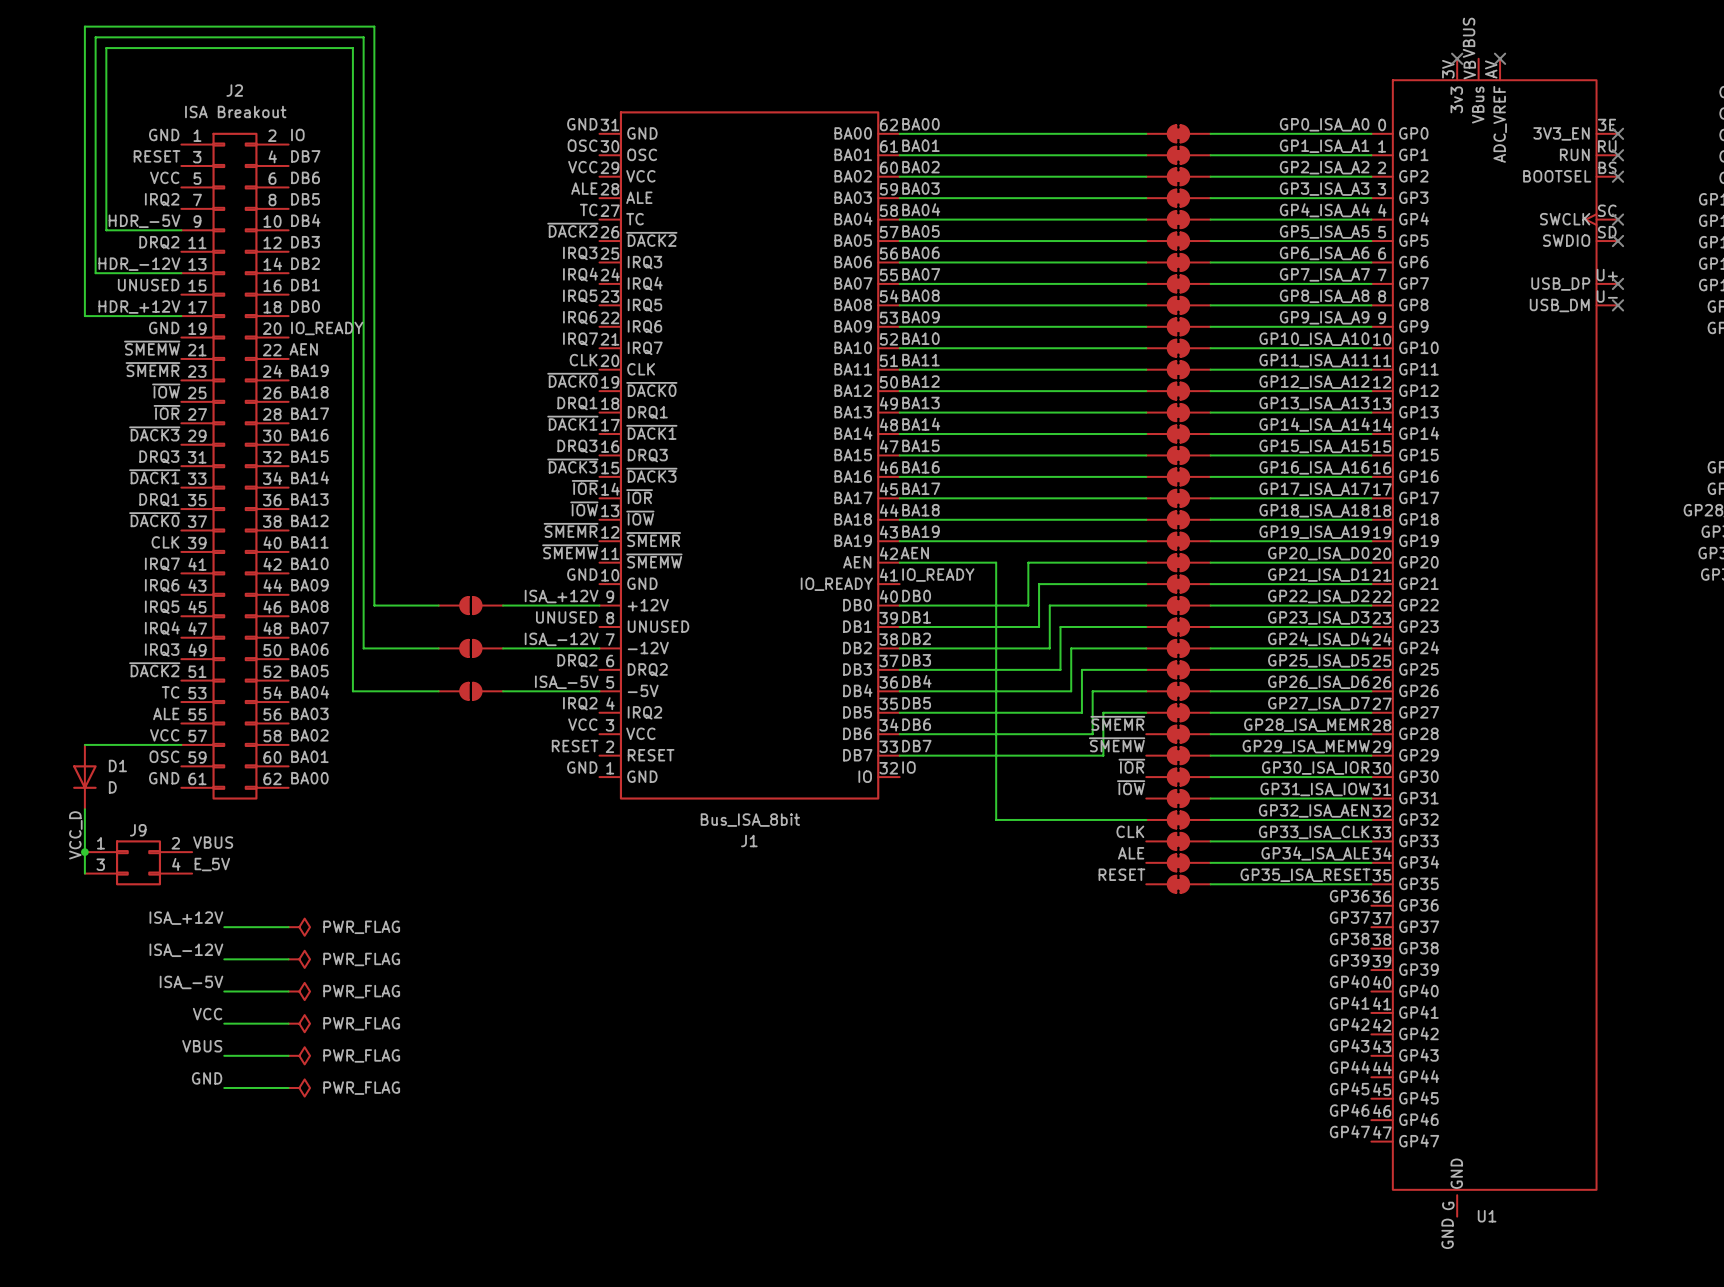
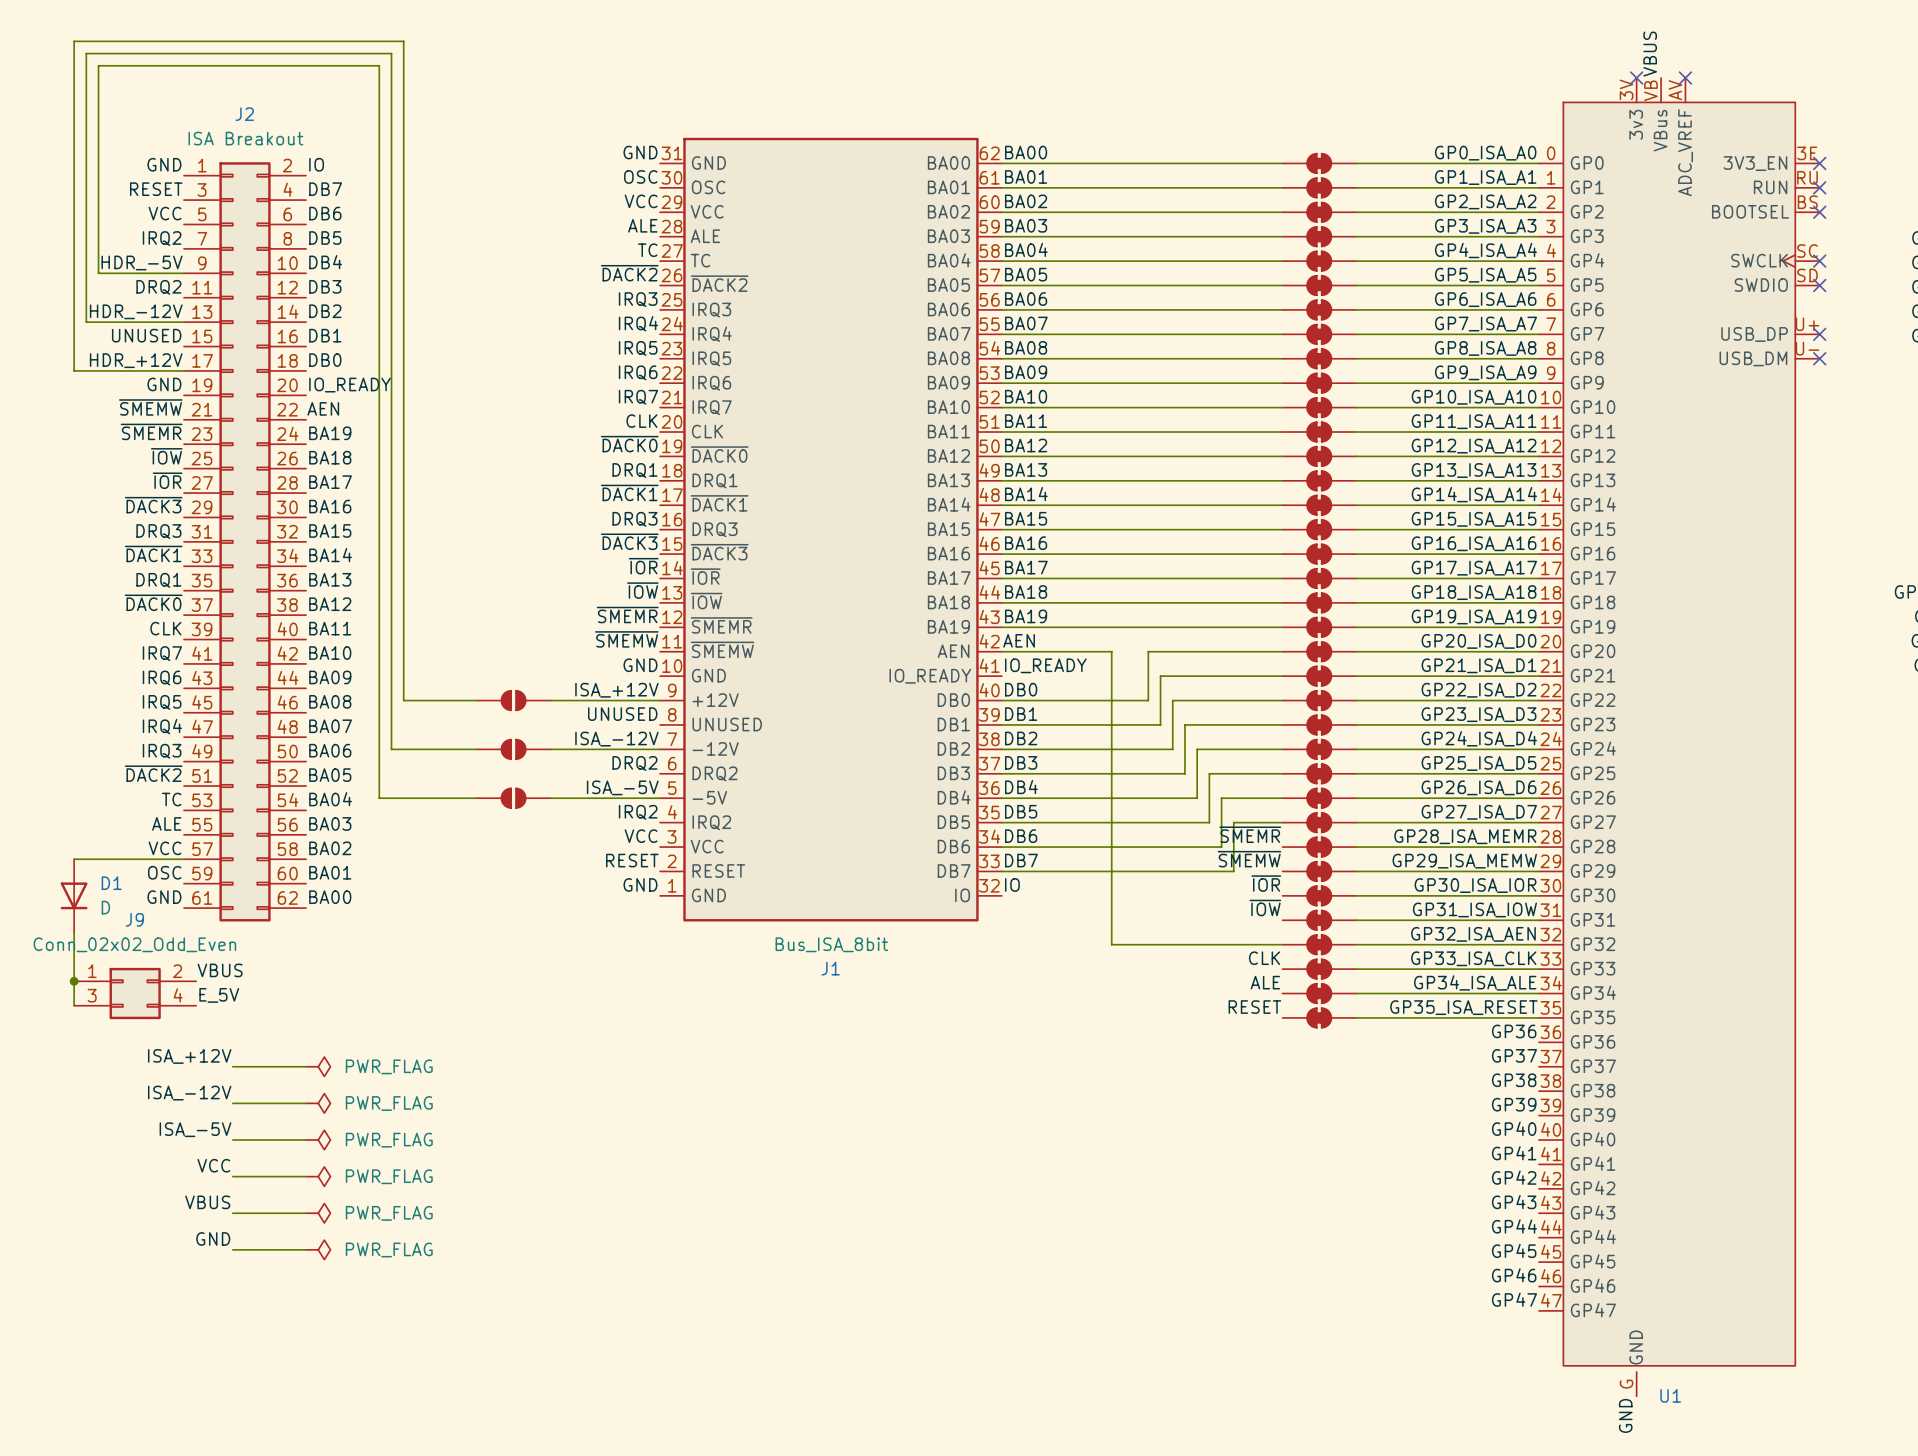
J9 value: none -> Conn_02x02_Odd_Even (134, 944)
J9 name position: J9 (138, 830) -> J9 (134, 919)
label: VCC_D (75, 835) -> none

